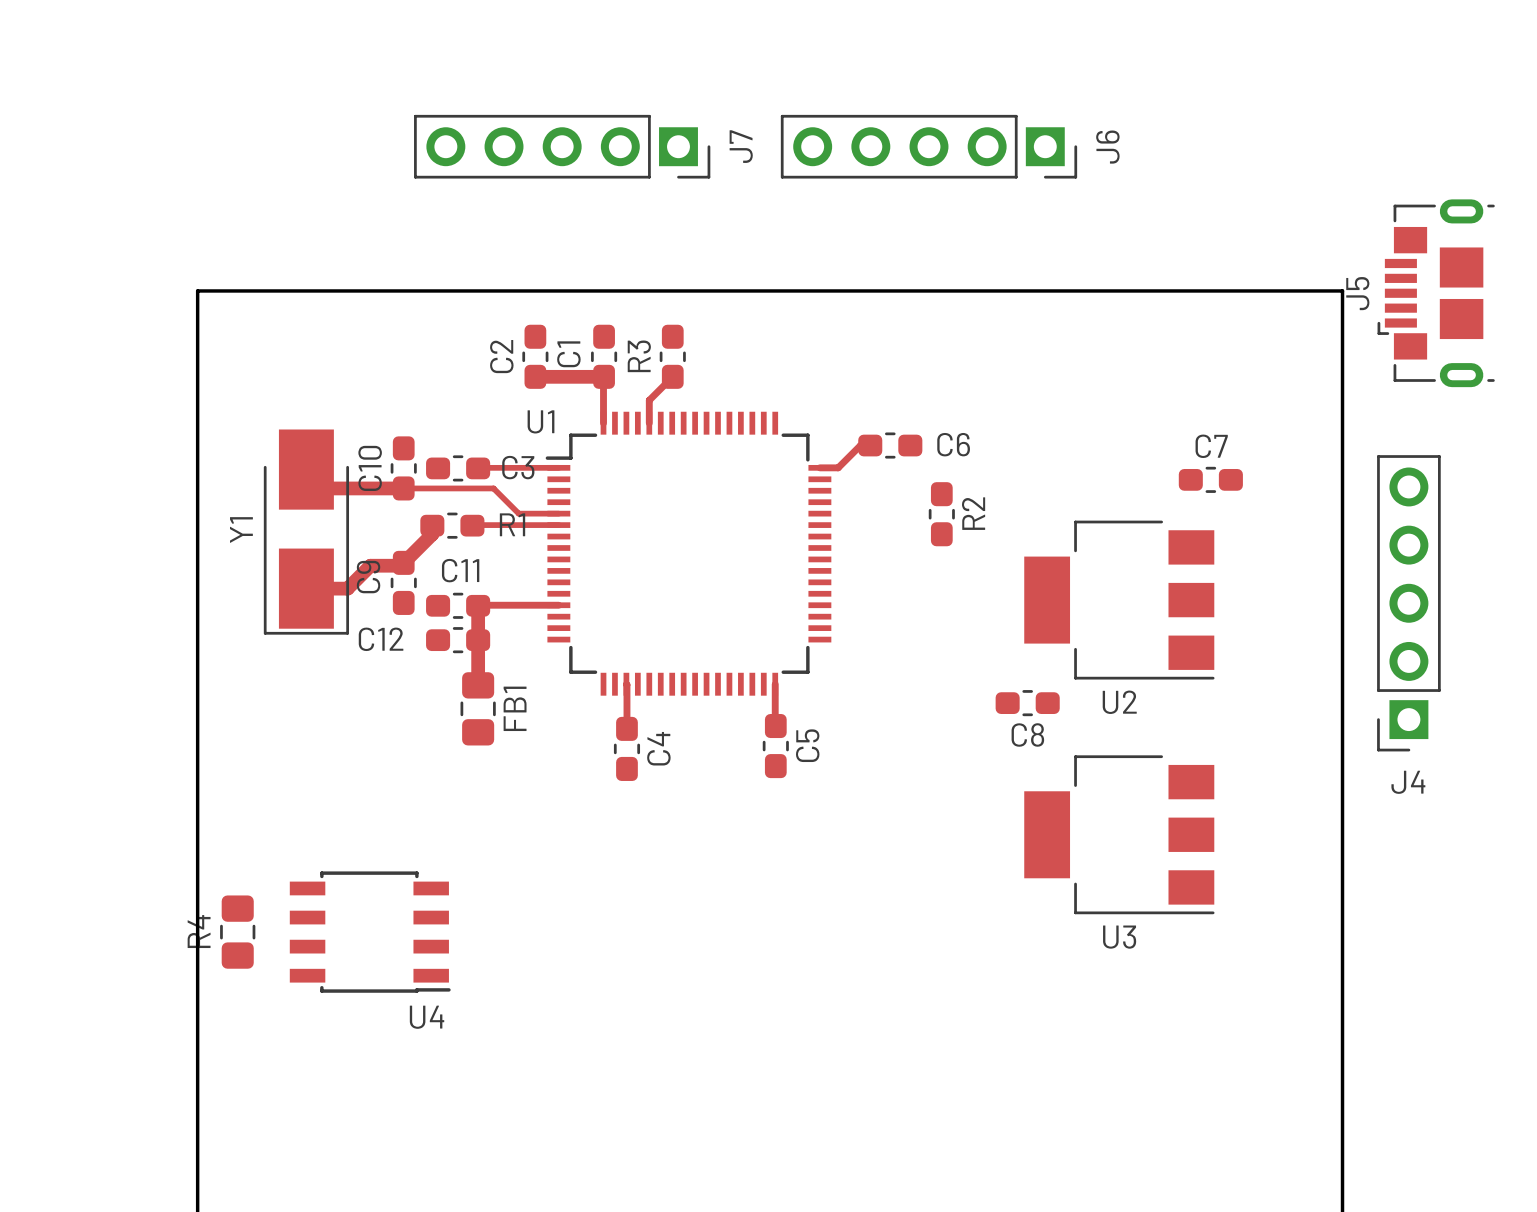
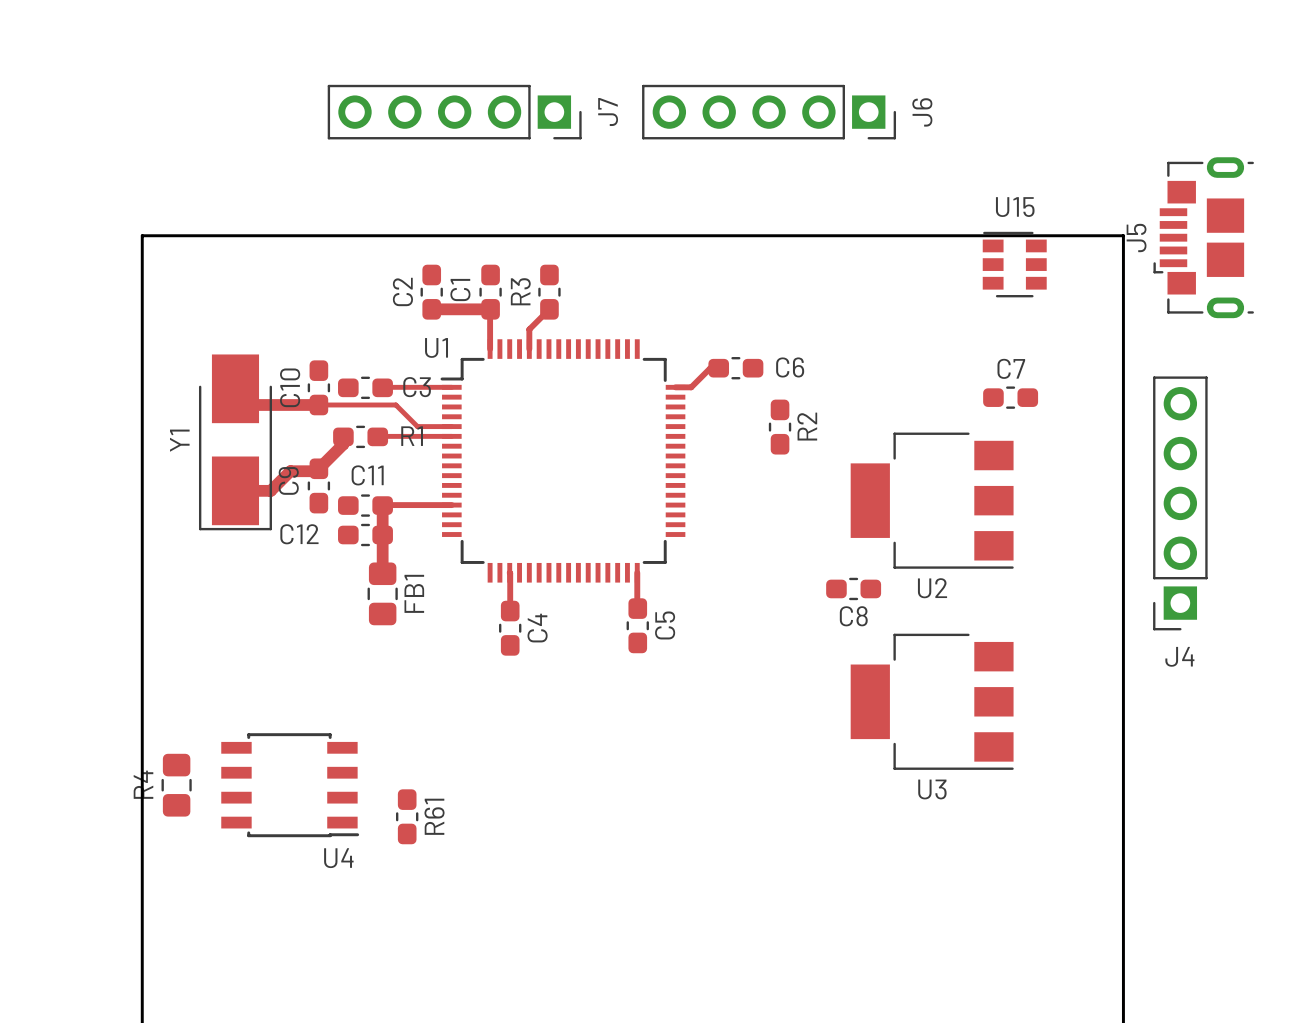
U15: none -> (1014, 264)
R61: none -> (407, 816)

